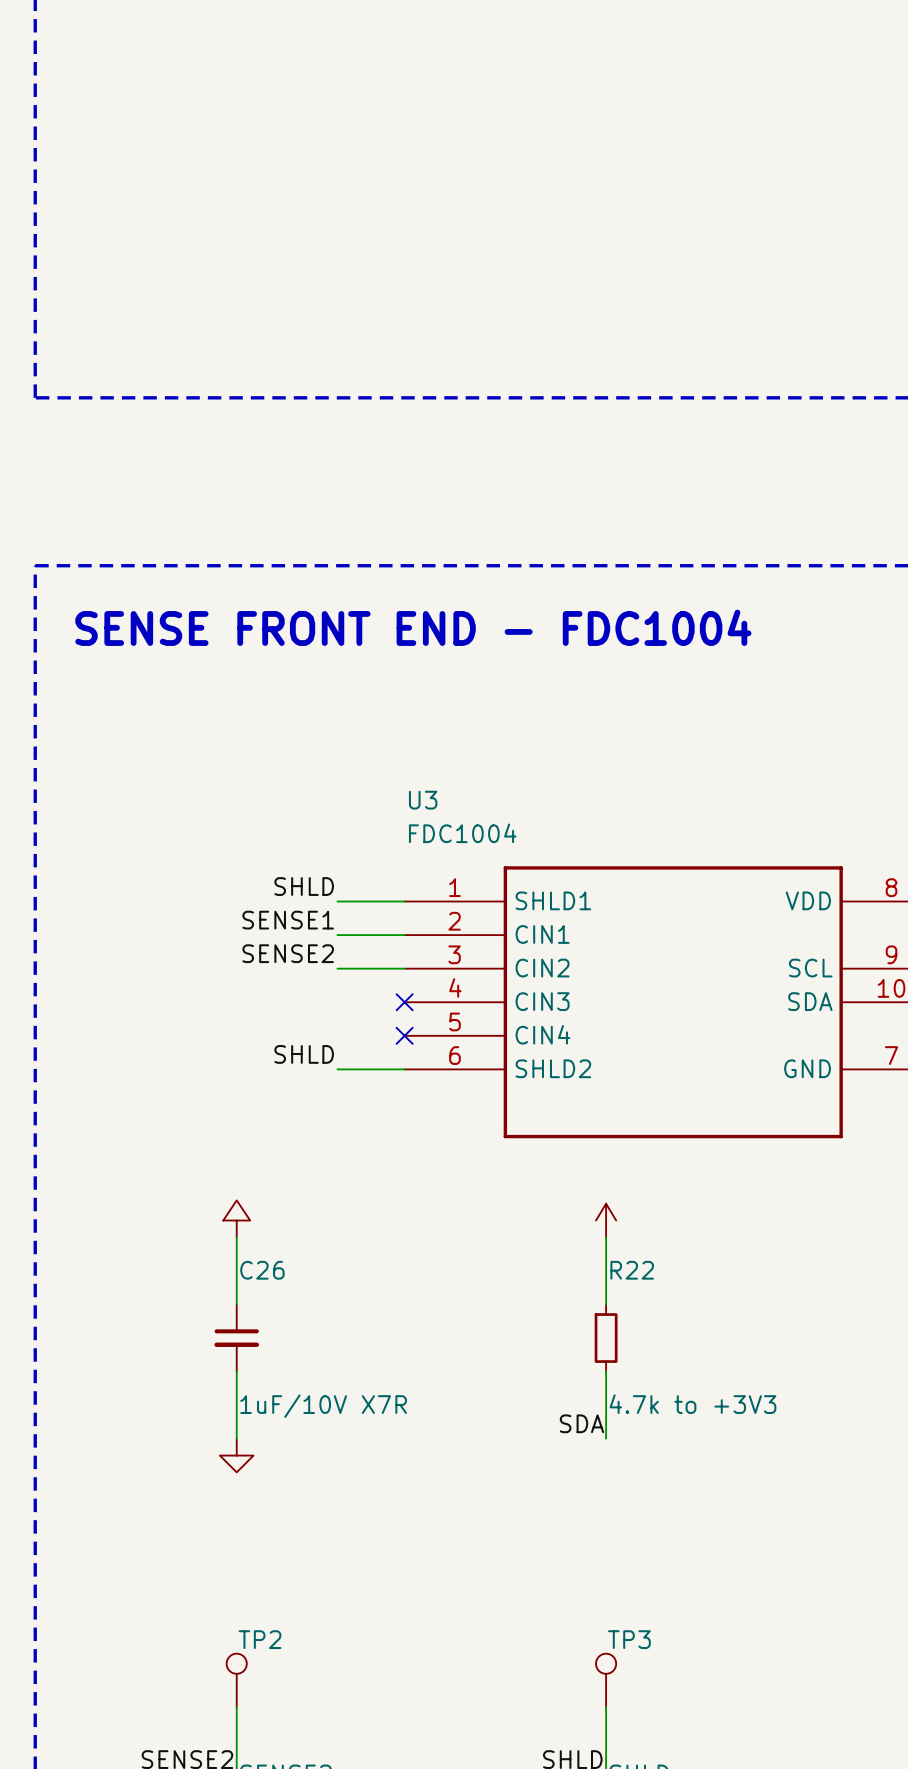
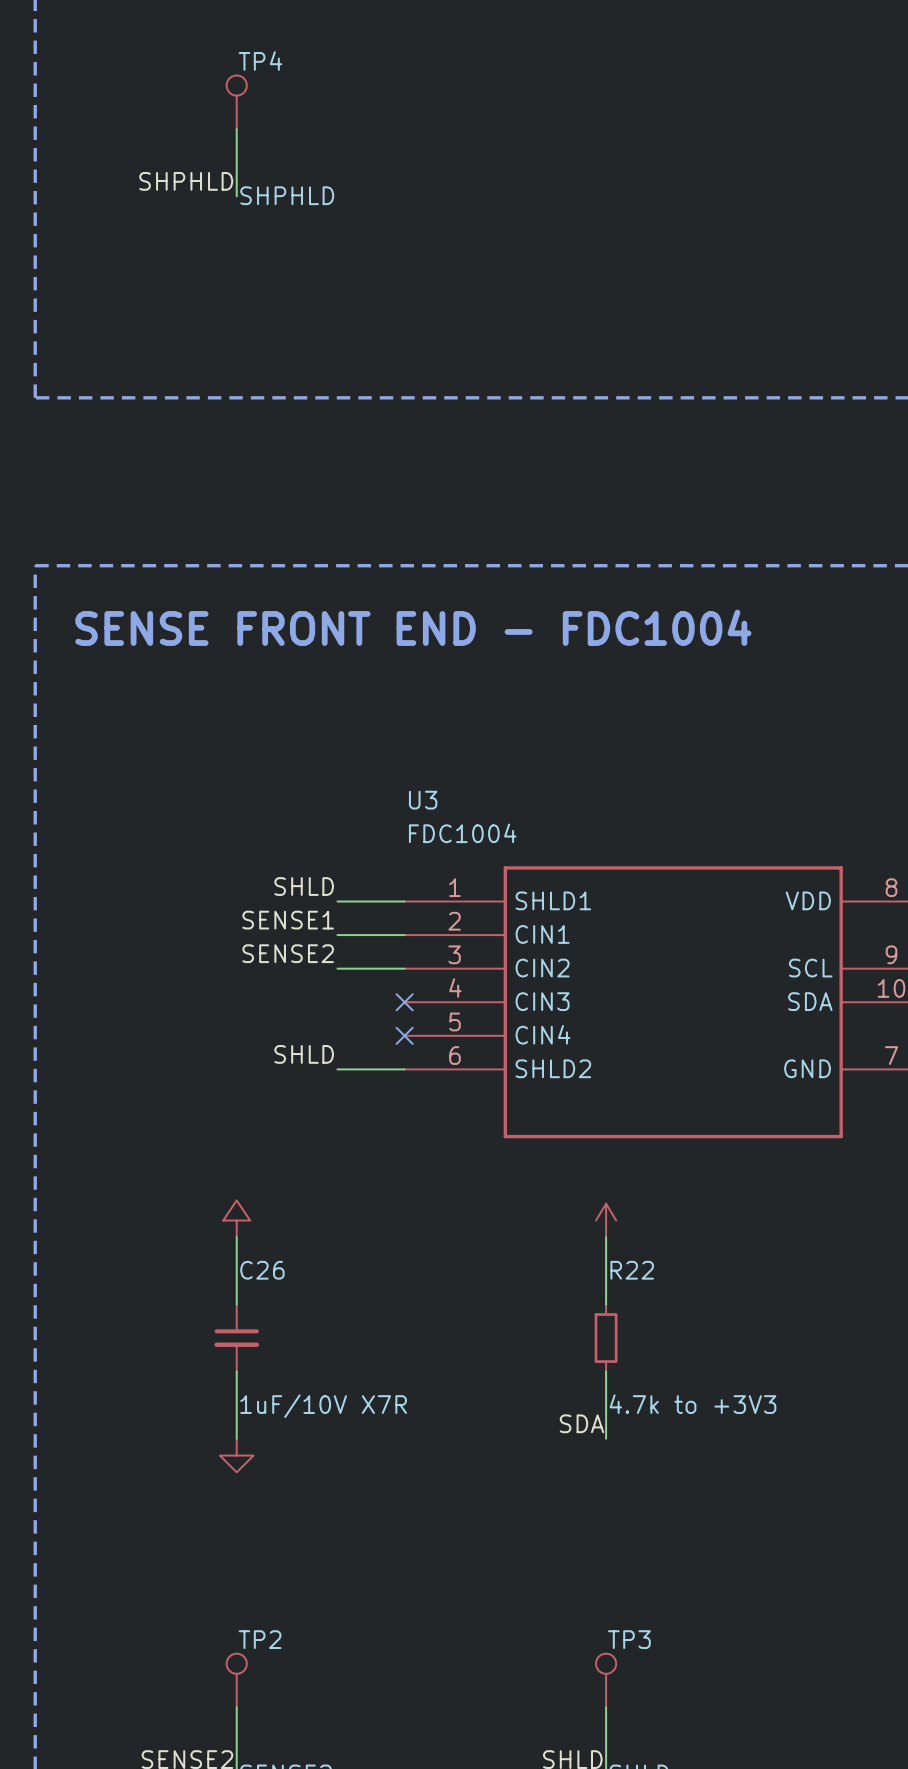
TP4: none -> SHPHLD (236, 102)
wire: none -> (236, 129) (236, 196)
label: none -> SHPHLD (186, 181)

